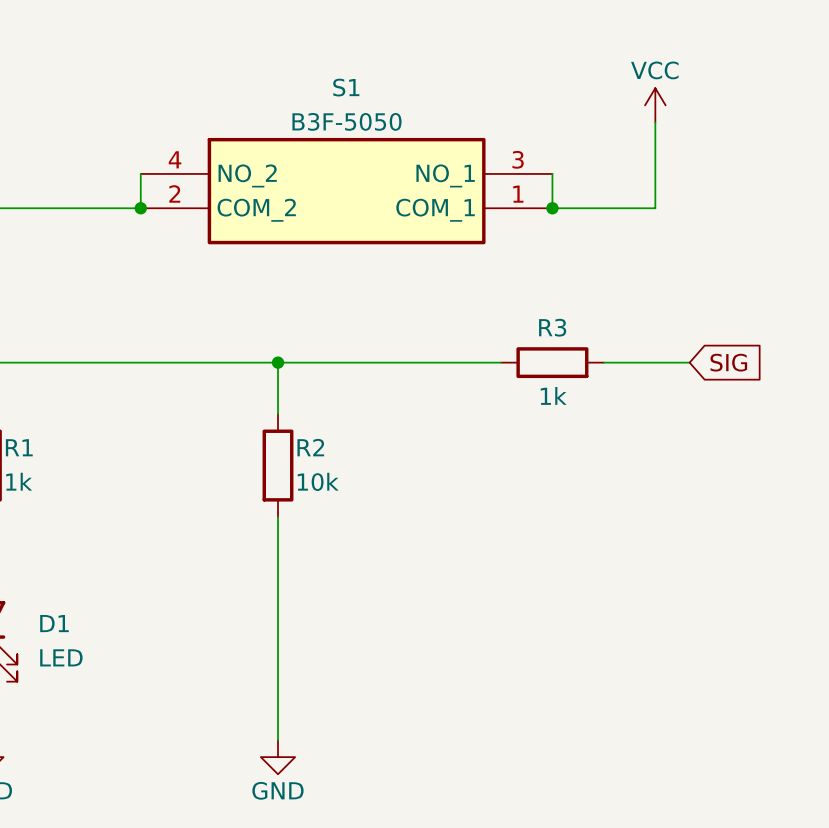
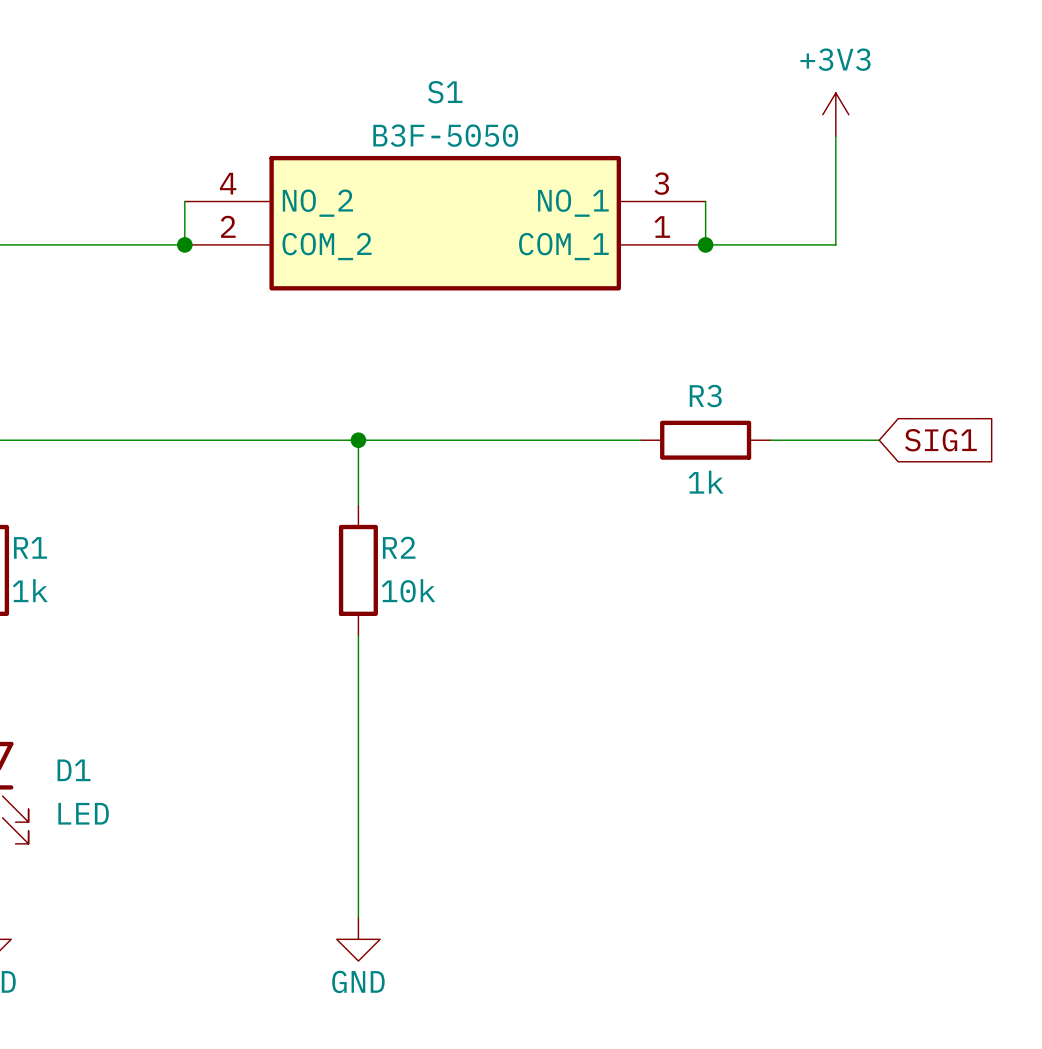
power symbol: VCC (655, 105) -> +3V3 (835, 114)
global label: SIG (728, 362) -> SIG1 (940, 440)

